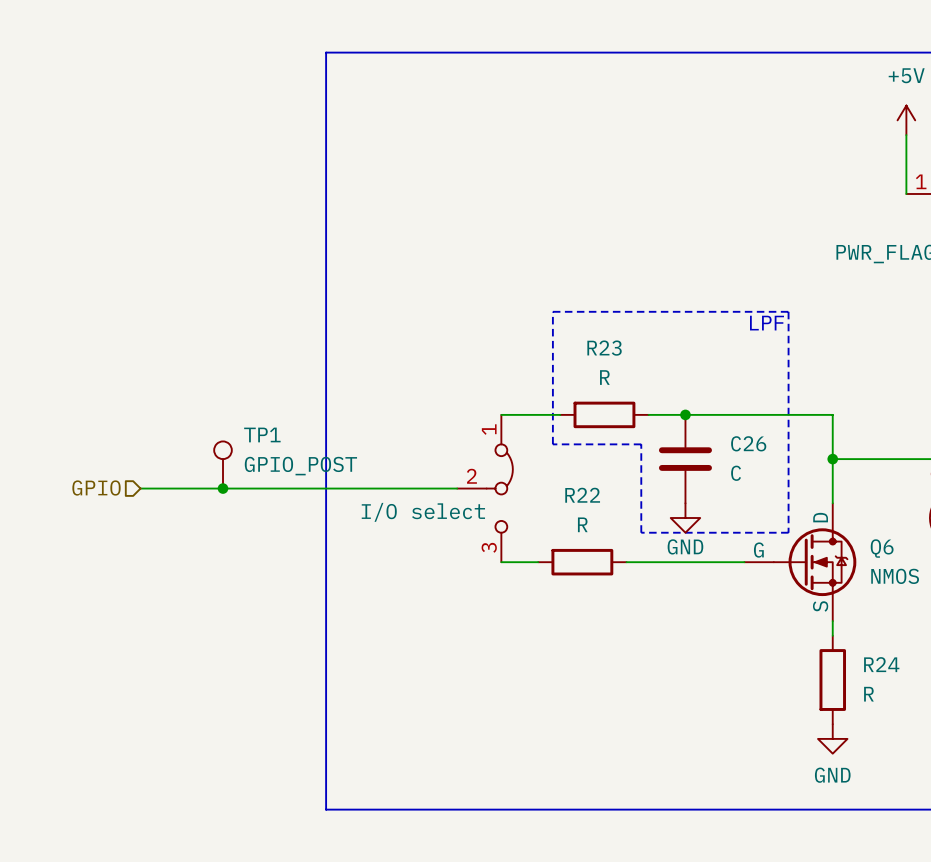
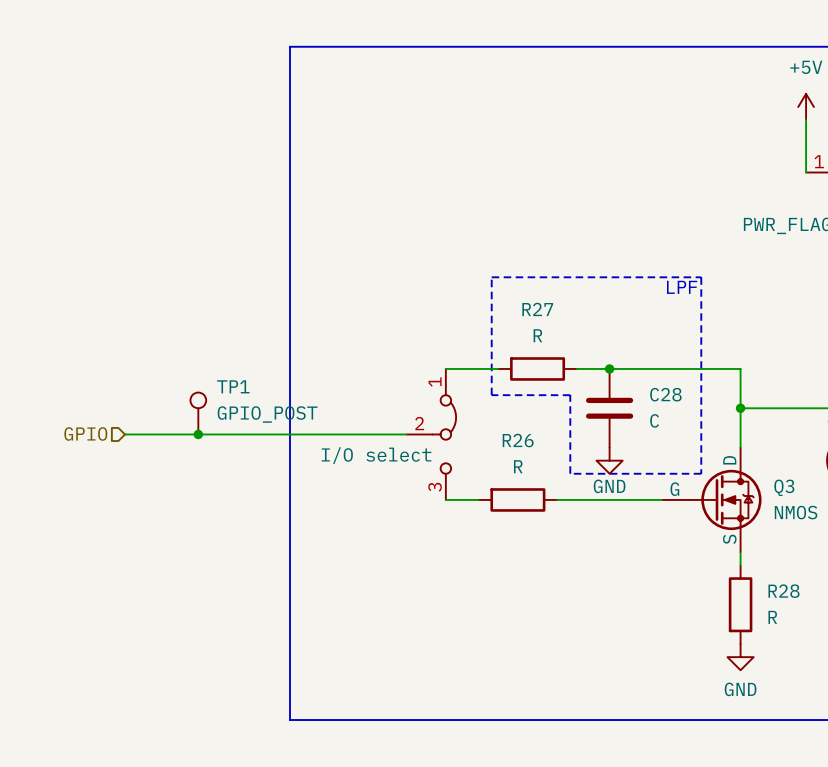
R23 name: R23 (604, 348) -> R27 (537, 309)
C26 name: C26 (748, 443) -> C28 (665, 394)
R22 name: R22 (582, 495) -> R26 (518, 440)
Q6 name: Q6 (882, 548) -> Q3 (784, 487)
R24 name: R24 (881, 664) -> R28 (783, 591)

